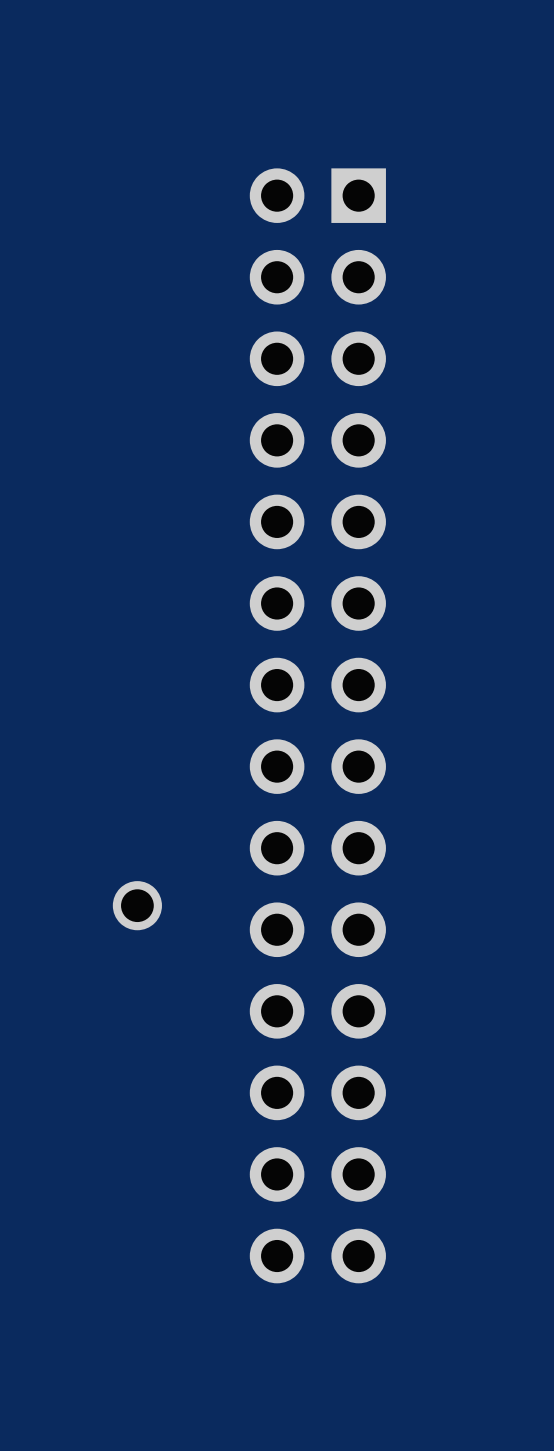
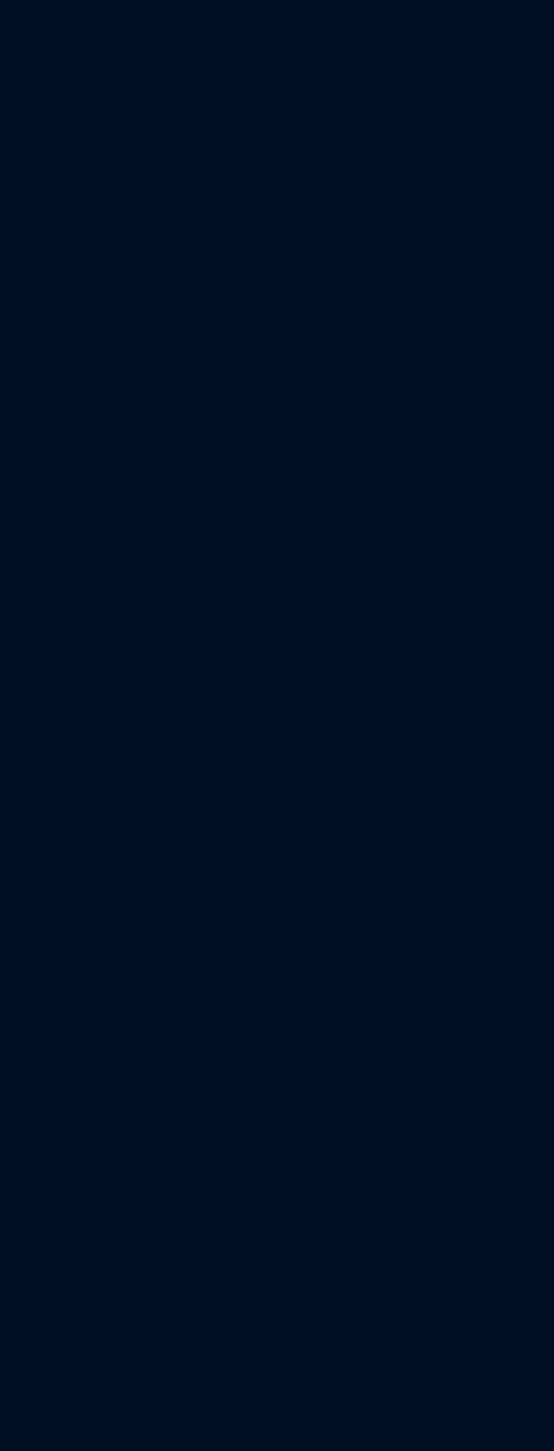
part: (317, 725) -> none
part: (137, 905) -> none

